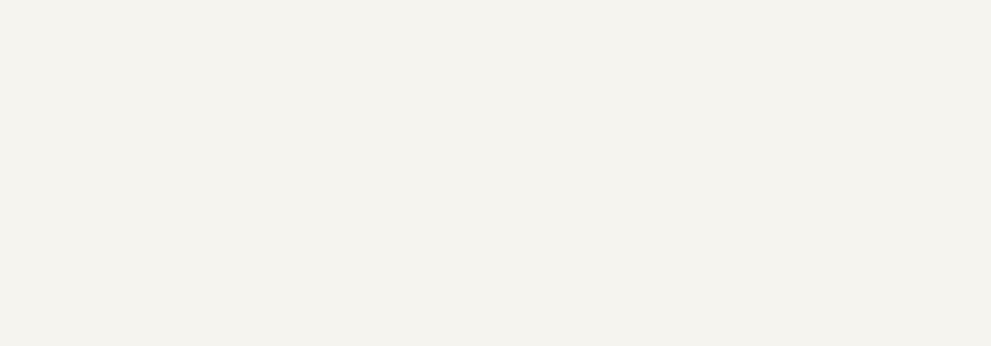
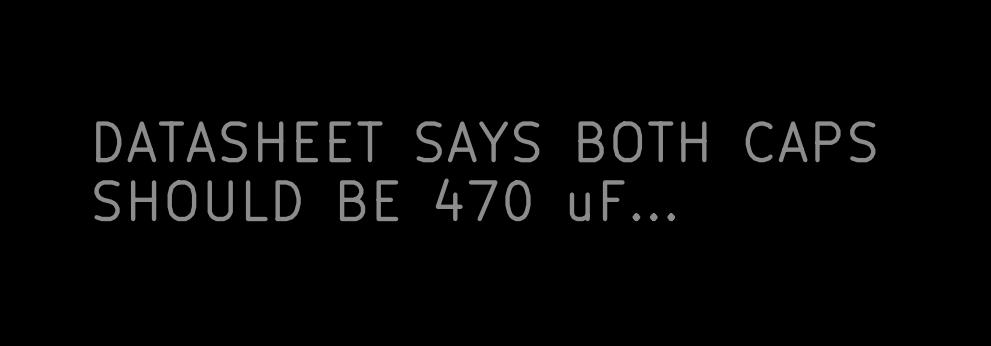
text: none -> DATASHEET SAYS BOTH CAPS (485, 141)
text: none -> SHOULD BE 470 uF... (384, 199)

